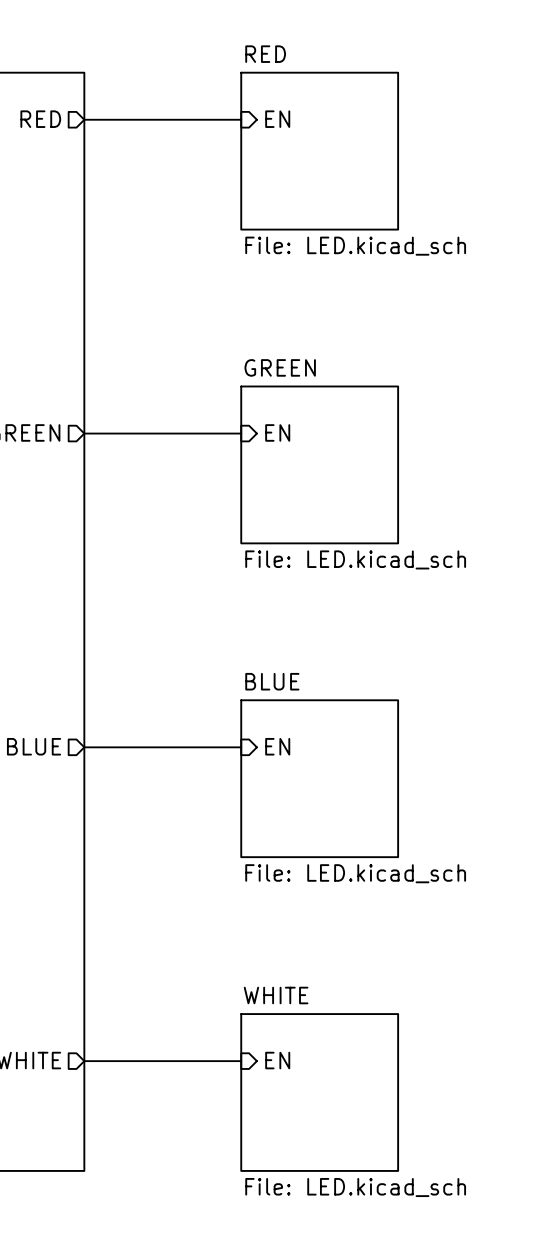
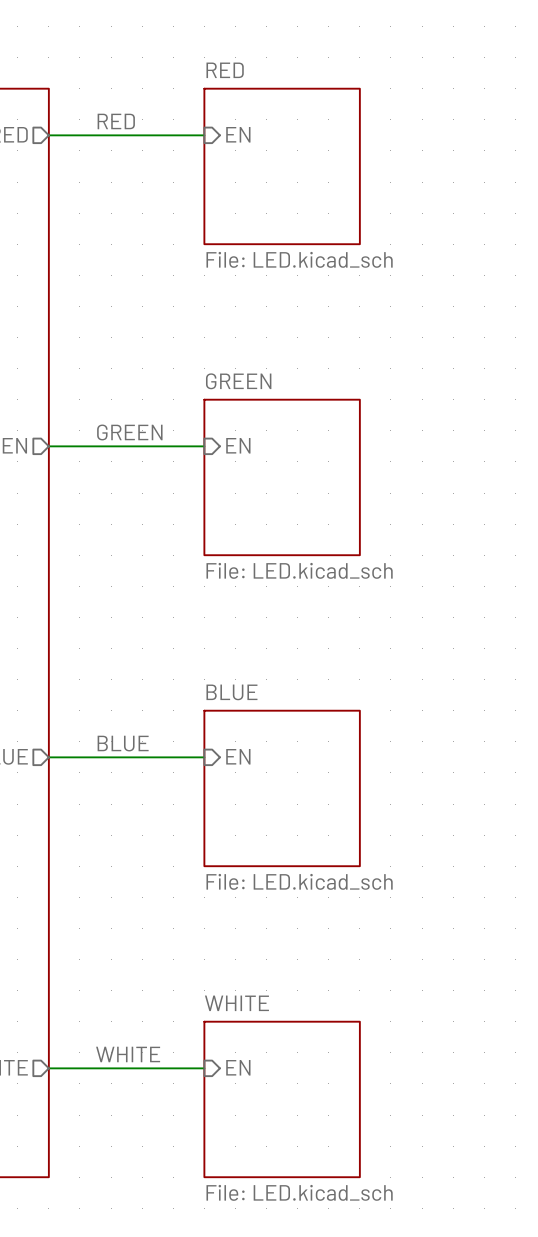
label: none -> RED (116, 121)
label: none -> GREEN (129, 432)
label: none -> BLUE (123, 743)
label: none -> WHITE (128, 1054)

